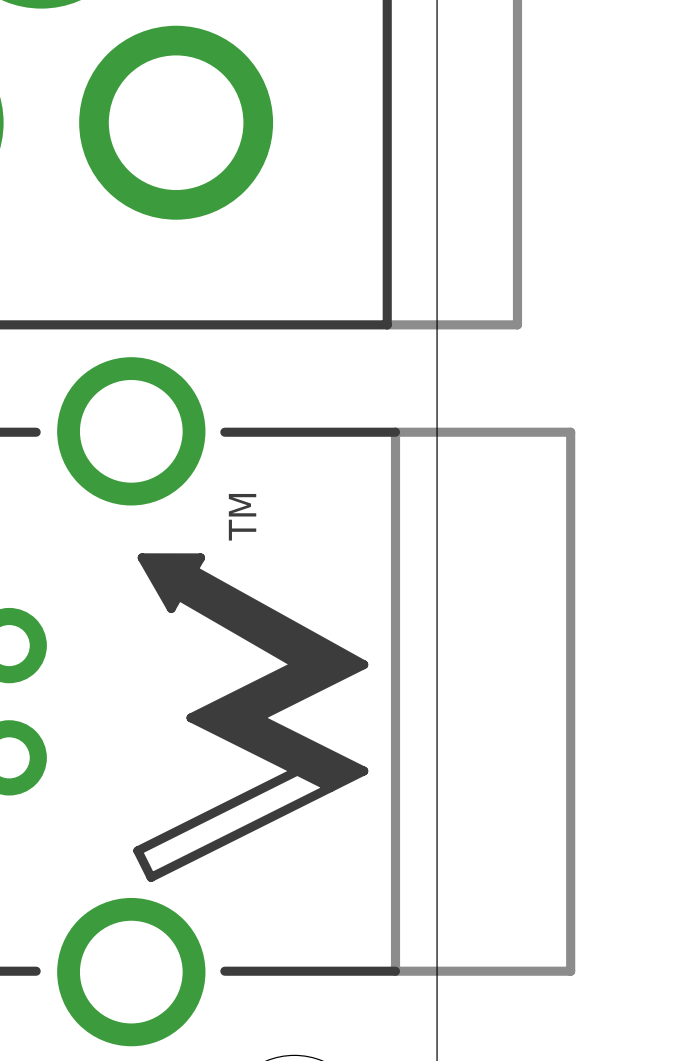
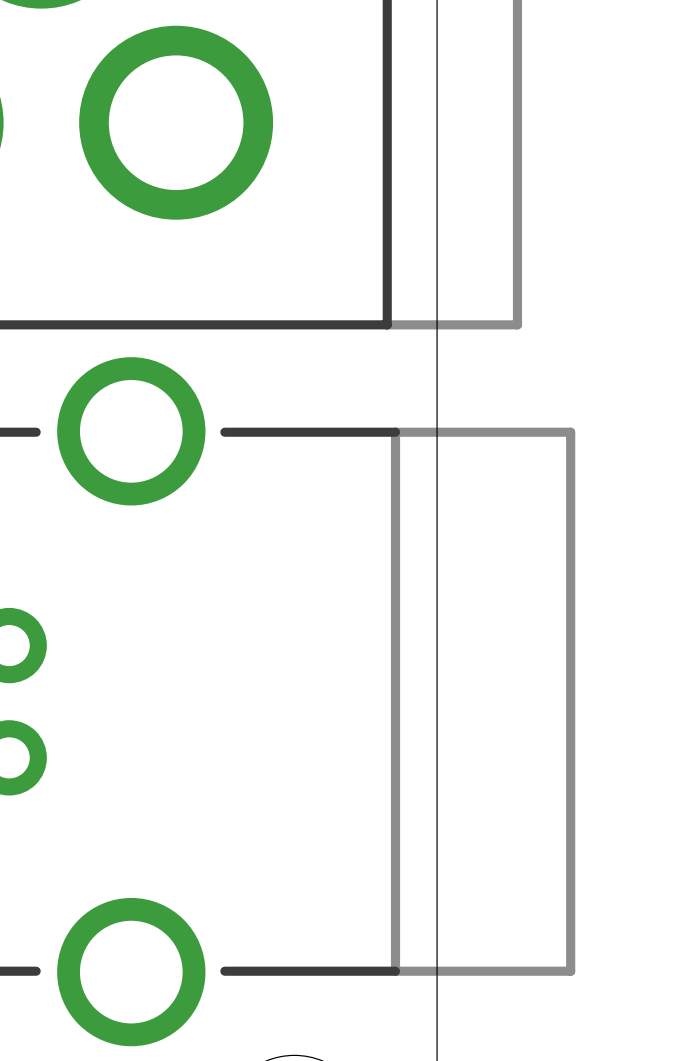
text: TM (242, 517) -> none
drawing: [133, 553, 369, 882] -> none

